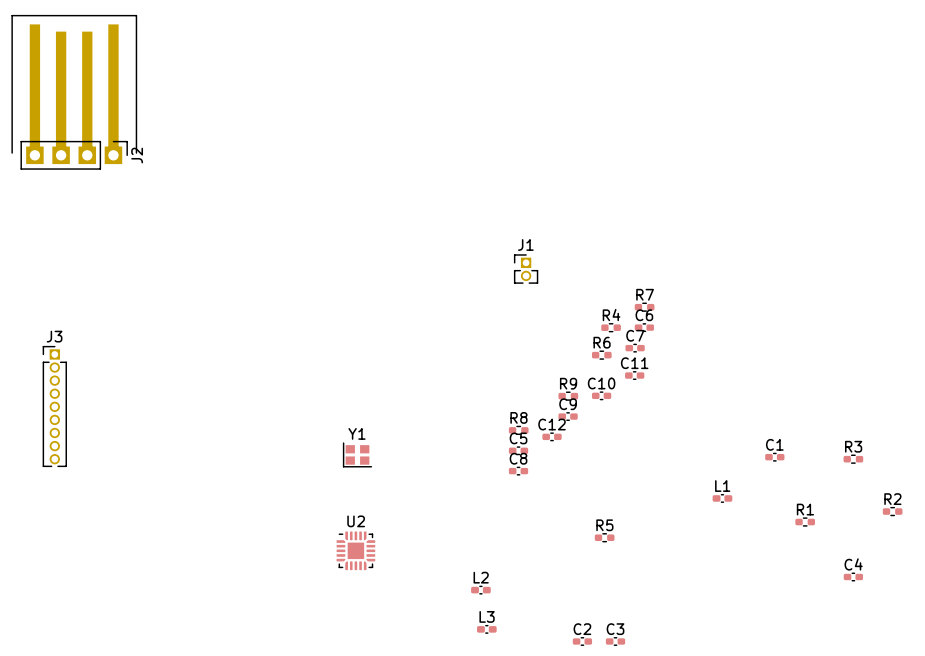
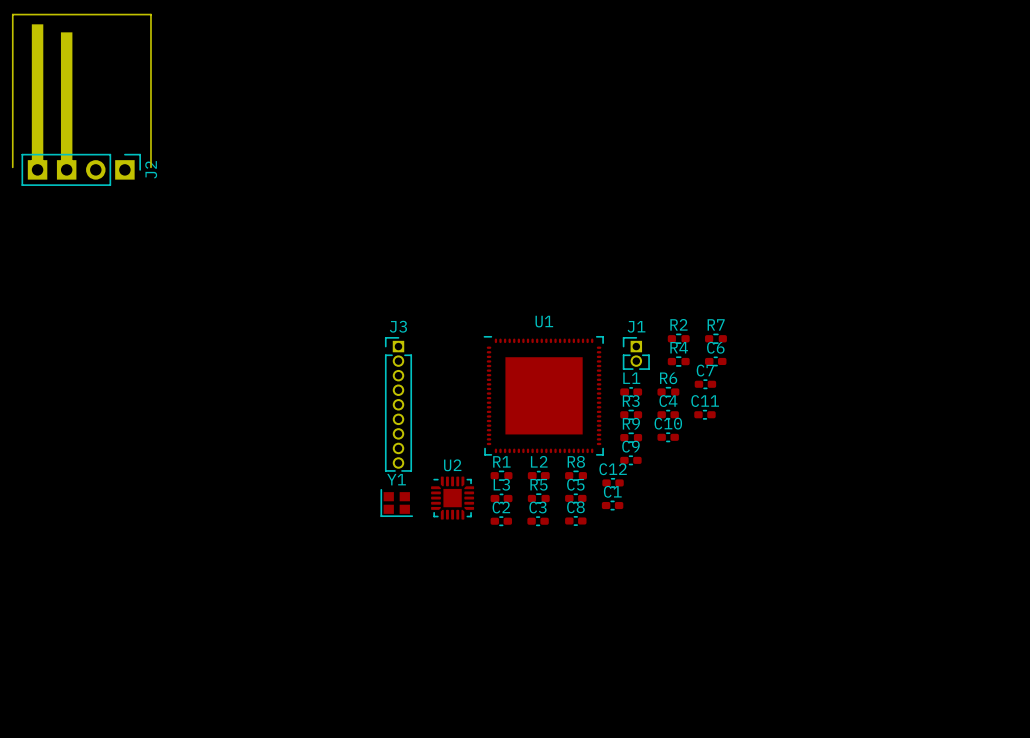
J2 footprint: [20, 24, 128, 170] -> [21, 24, 141, 186]
J1 position: (526, 269) -> (636, 353)
U1: none -> (543, 395)
J3 position: (54, 406) -> (398, 404)
C1 position: (774, 457) -> (612, 505)
R3 position: (853, 459) -> (631, 414)
L1 position: (722, 498) -> (631, 392)
R2 position: (892, 511) -> (678, 338)
R1 position: (805, 522) -> (501, 475)
R5 position: (604, 537) -> (538, 498)
U2 position: (355, 550) -> (452, 498)
C4 position: (853, 577) -> (668, 414)
L2 position: (480, 590) -> (538, 475)
L3 position: (486, 629) -> (501, 498)
C2 position: (582, 641) -> (501, 521)
C3 position: (615, 641) -> (538, 521)

